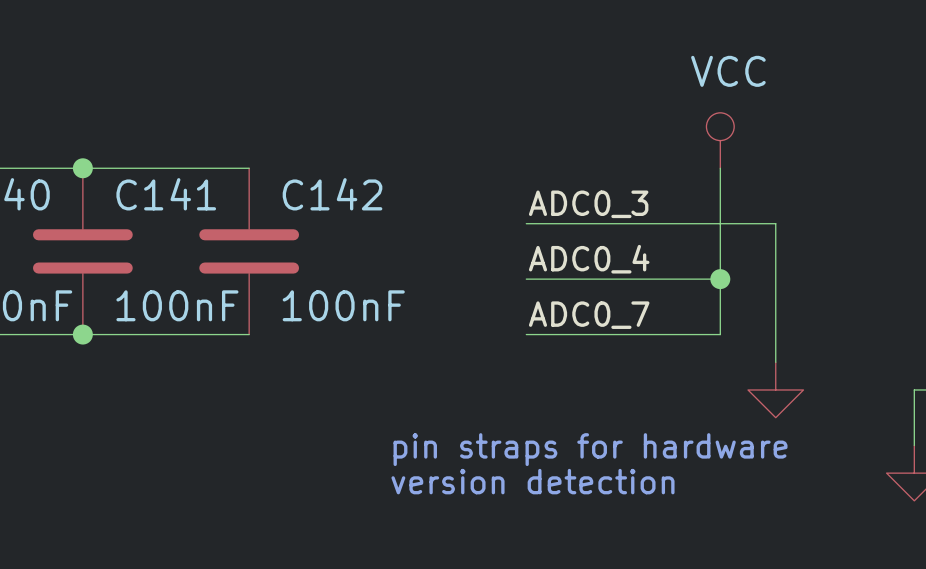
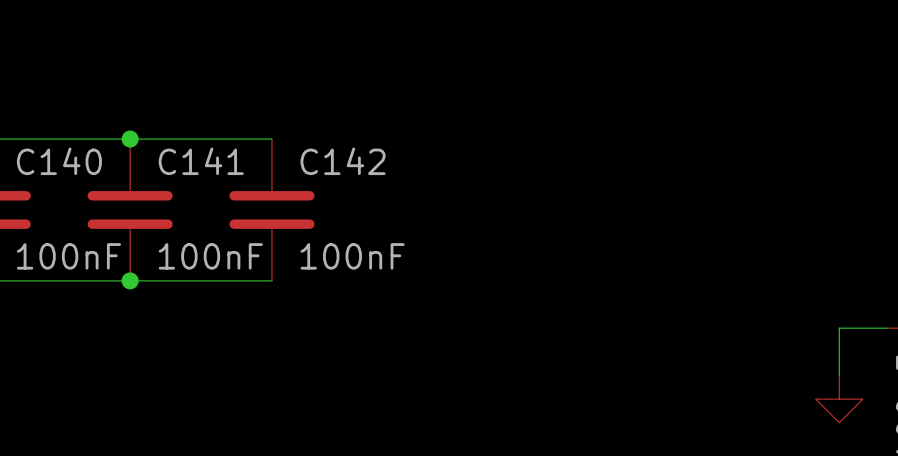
power symbol: VCC (720, 140) -> none
wire: (720, 168) (720, 334) (526, 334) -> none
label: ADC0_3 (588, 204) -> none
wire: (526, 223) (775, 223) (775, 362) -> none
label: ADC0_4 (589, 259) -> none
wire: (526, 279) (720, 279) -> none
junction: (720, 279) -> none
label: ADC0_7 (589, 315) -> none
power symbol: (775, 389) -> none
text: pin straps for hardware (590, 449) -> none
text: version detection (532, 481) -> none

